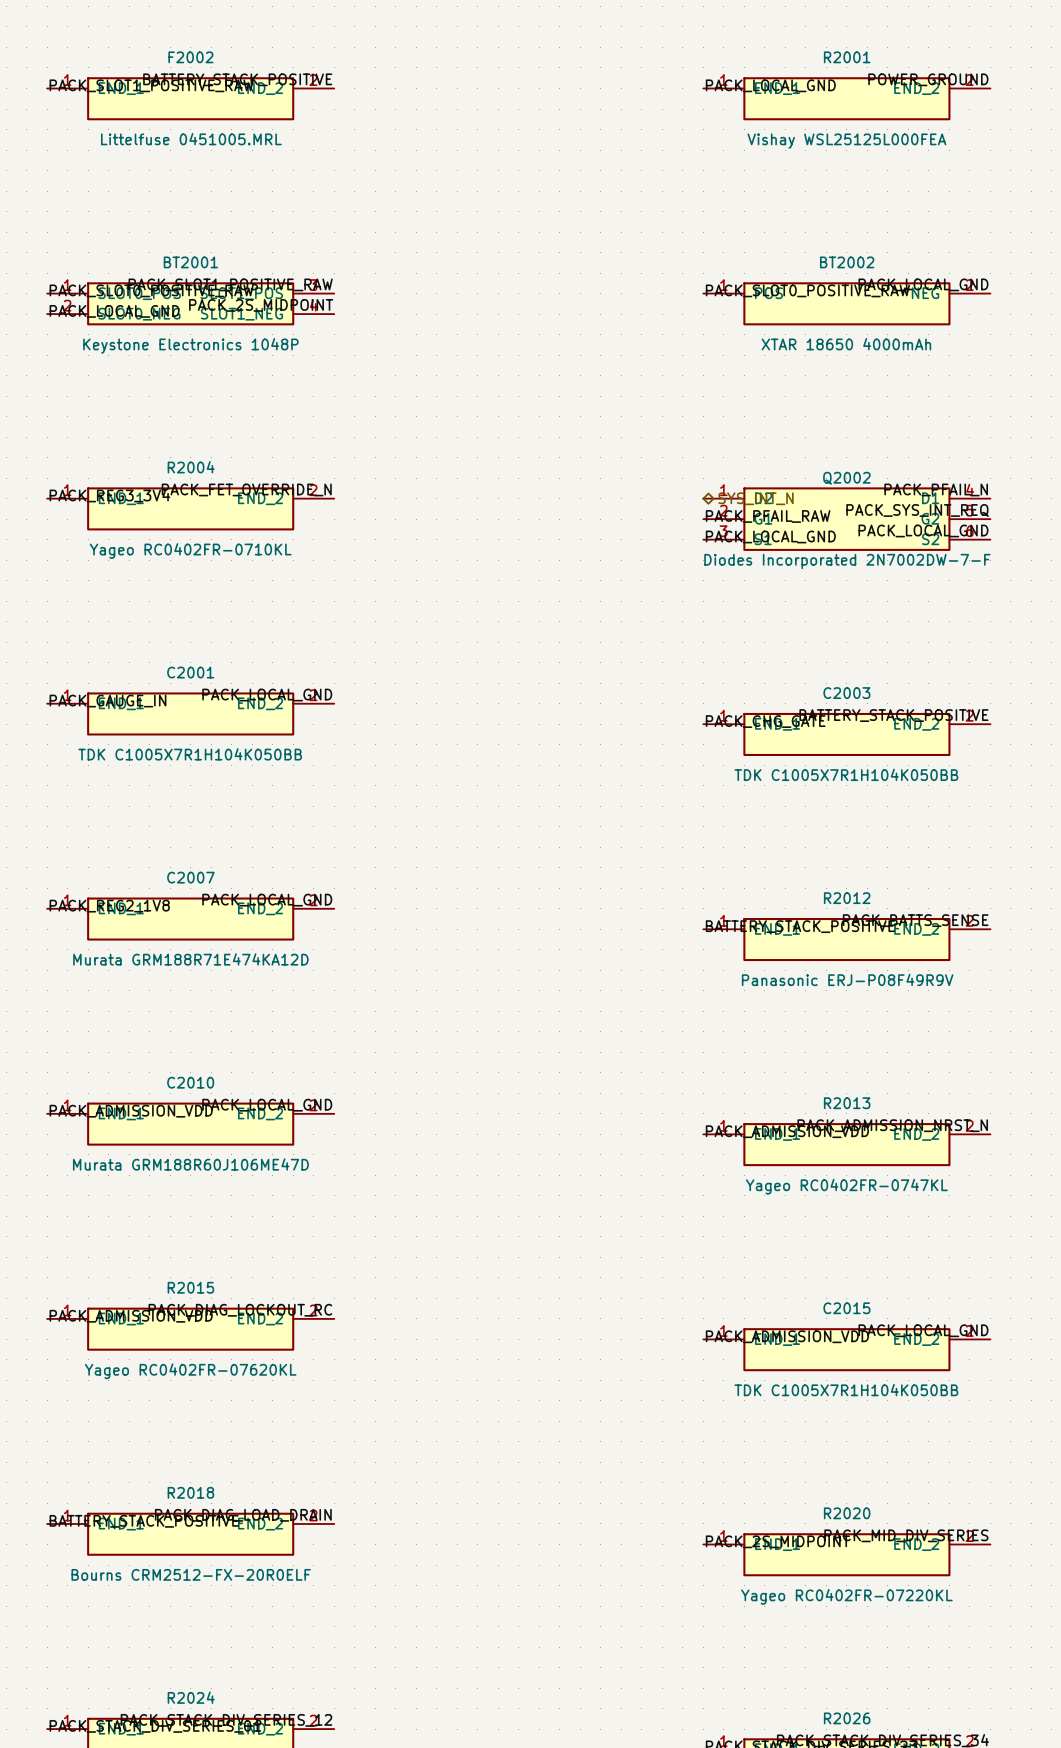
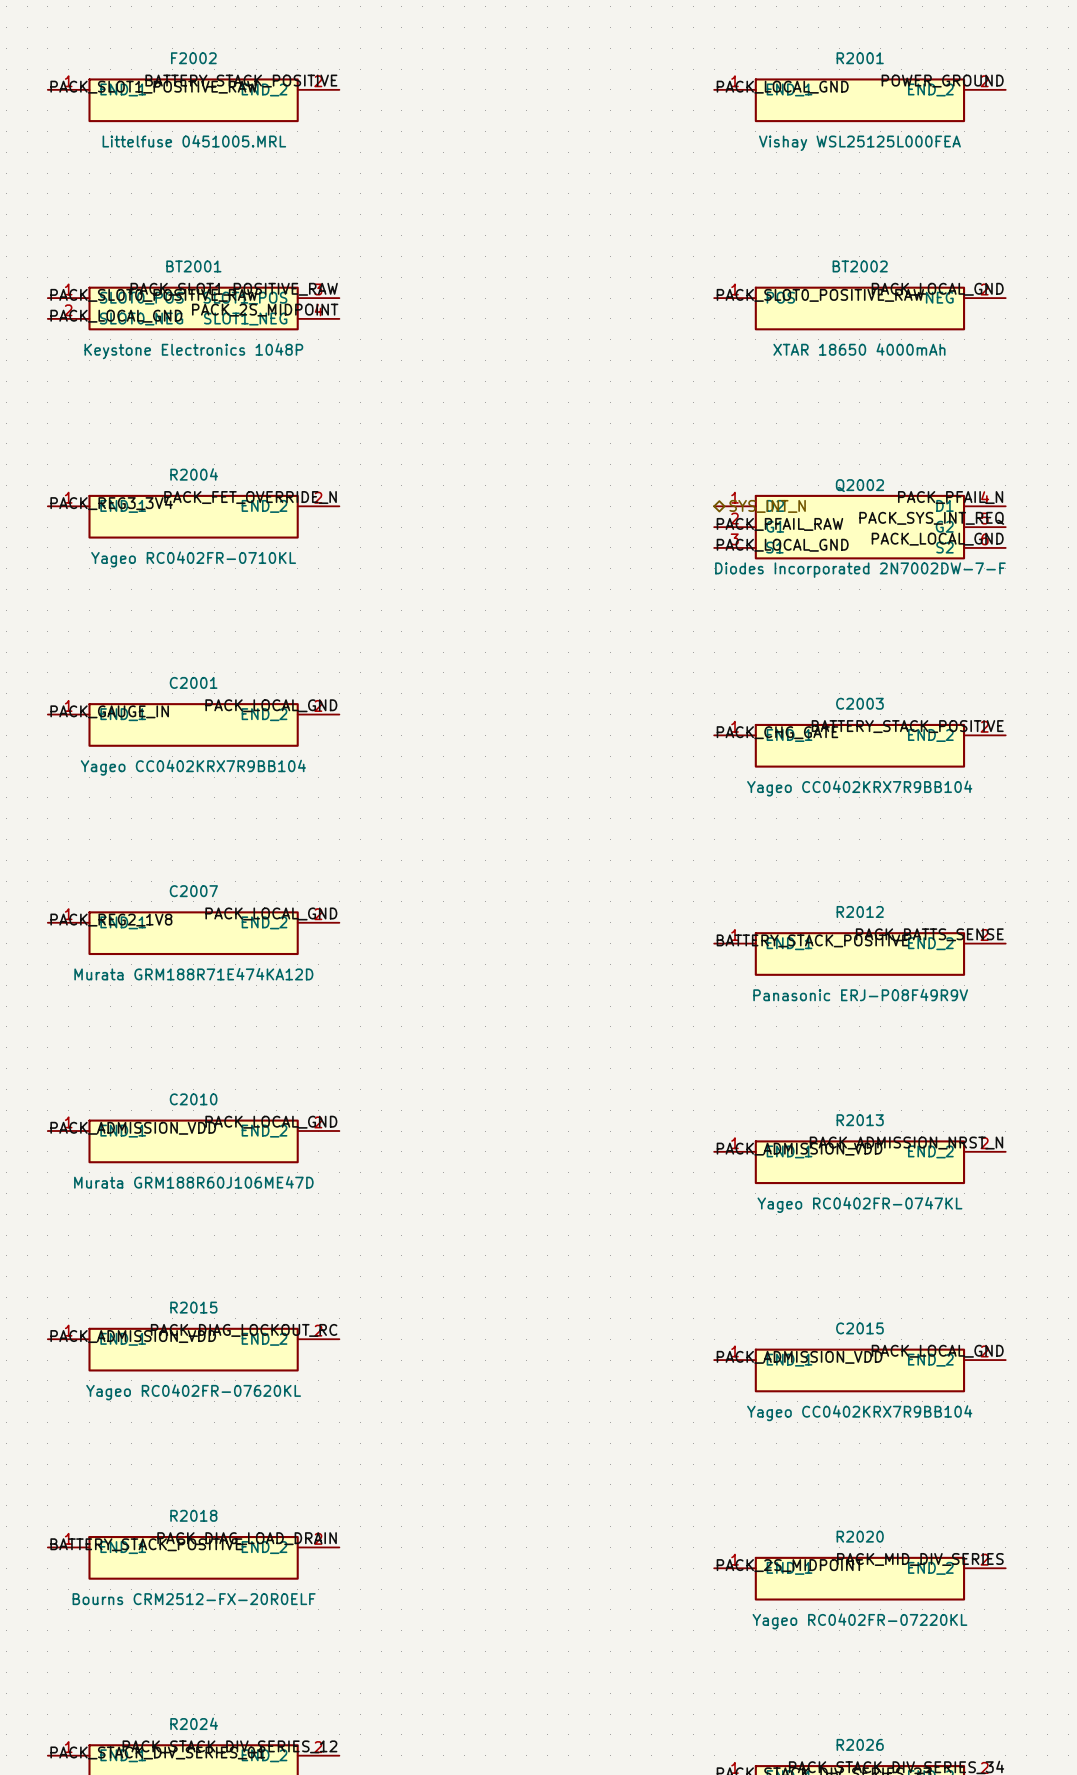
C2001 value: TDK C1005X7R1H104K050BB (190, 754) -> Yageo CC0402KRX7R9BB104 (193, 767)
C2003 value: TDK C1005X7R1H104K050BB (846, 774) -> Yageo CC0402KRX7R9BB104 (859, 788)
C2015 value: TDK C1005X7R1H104K050BB (846, 1390) -> Yageo CC0402KRX7R9BB104 (859, 1413)

